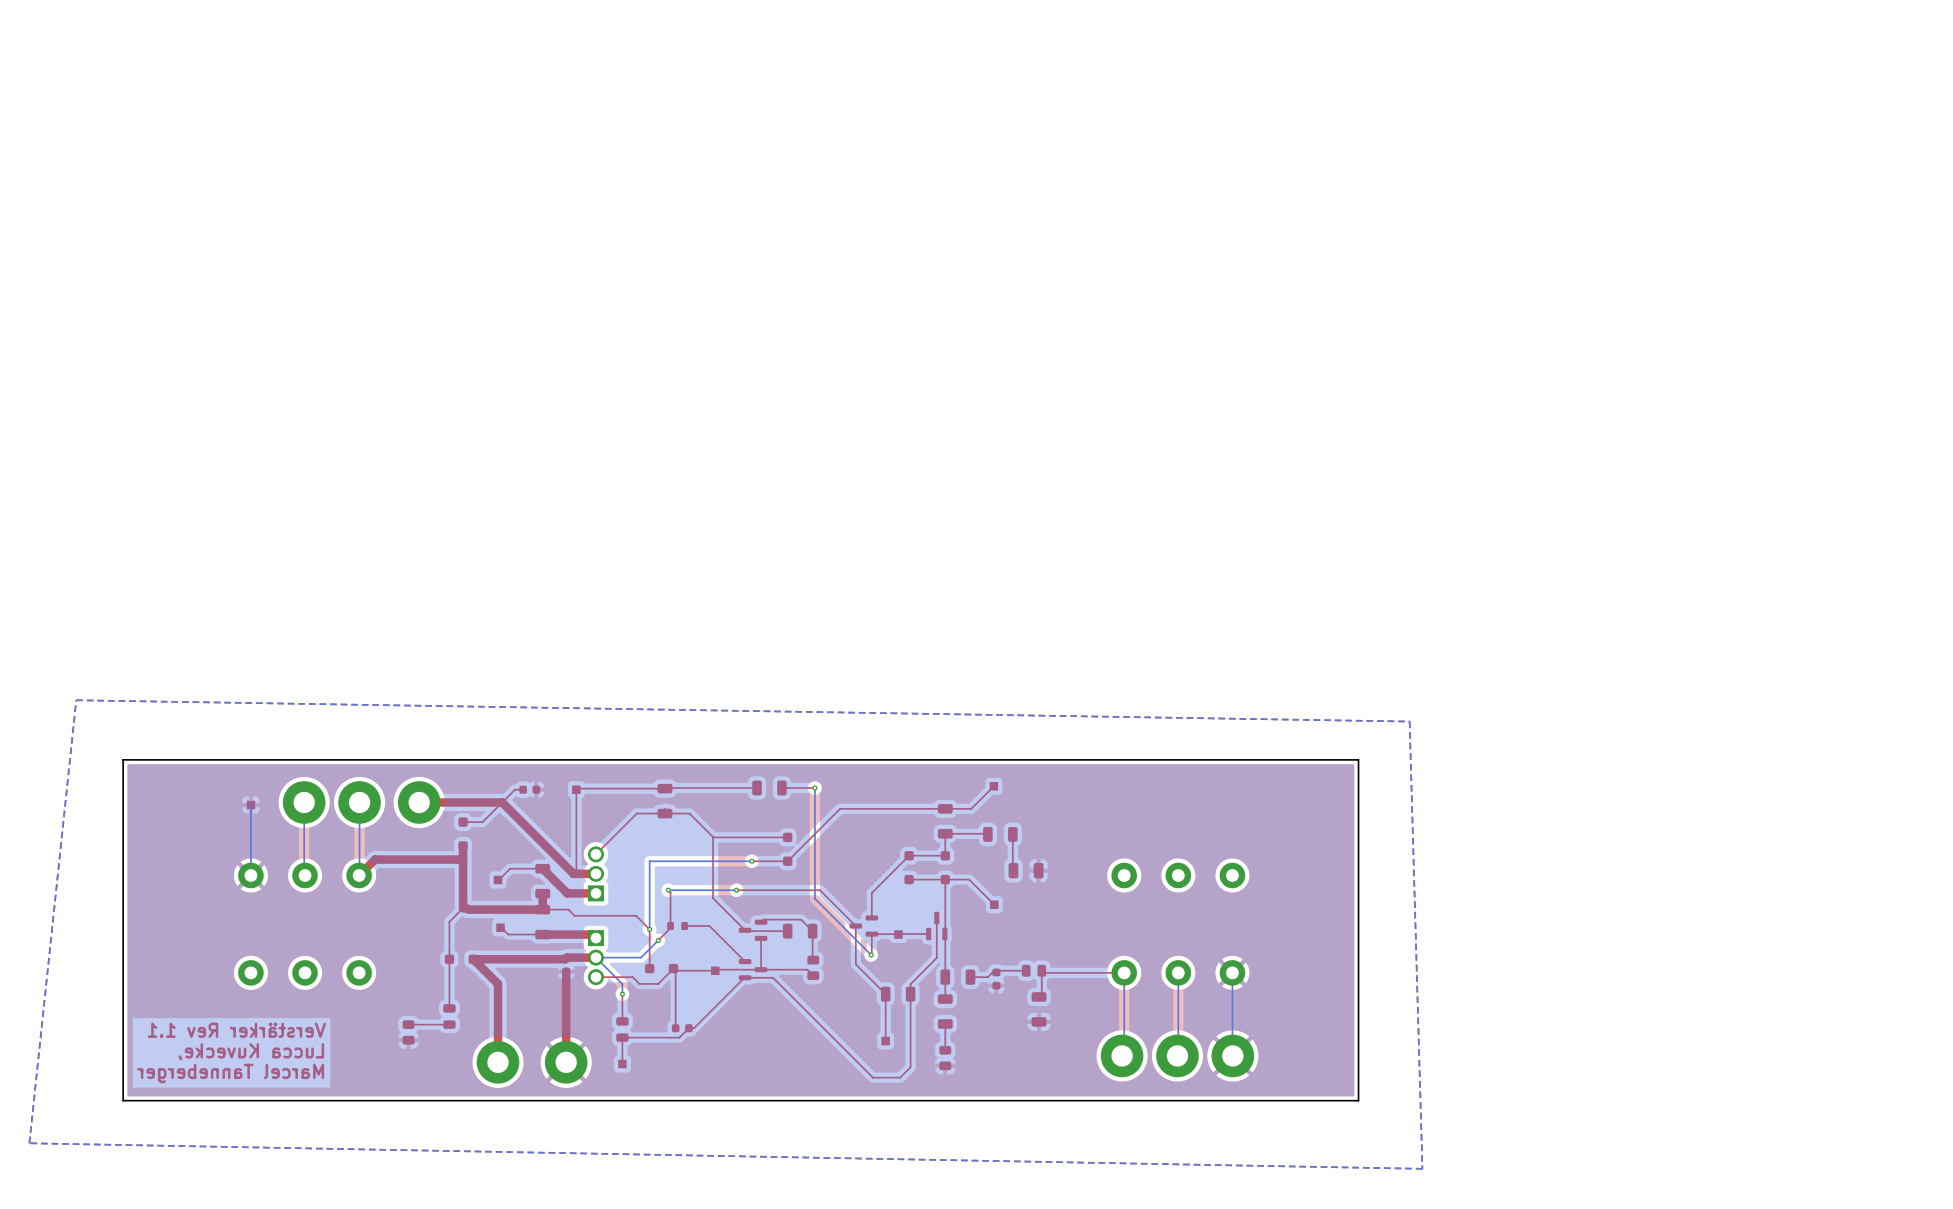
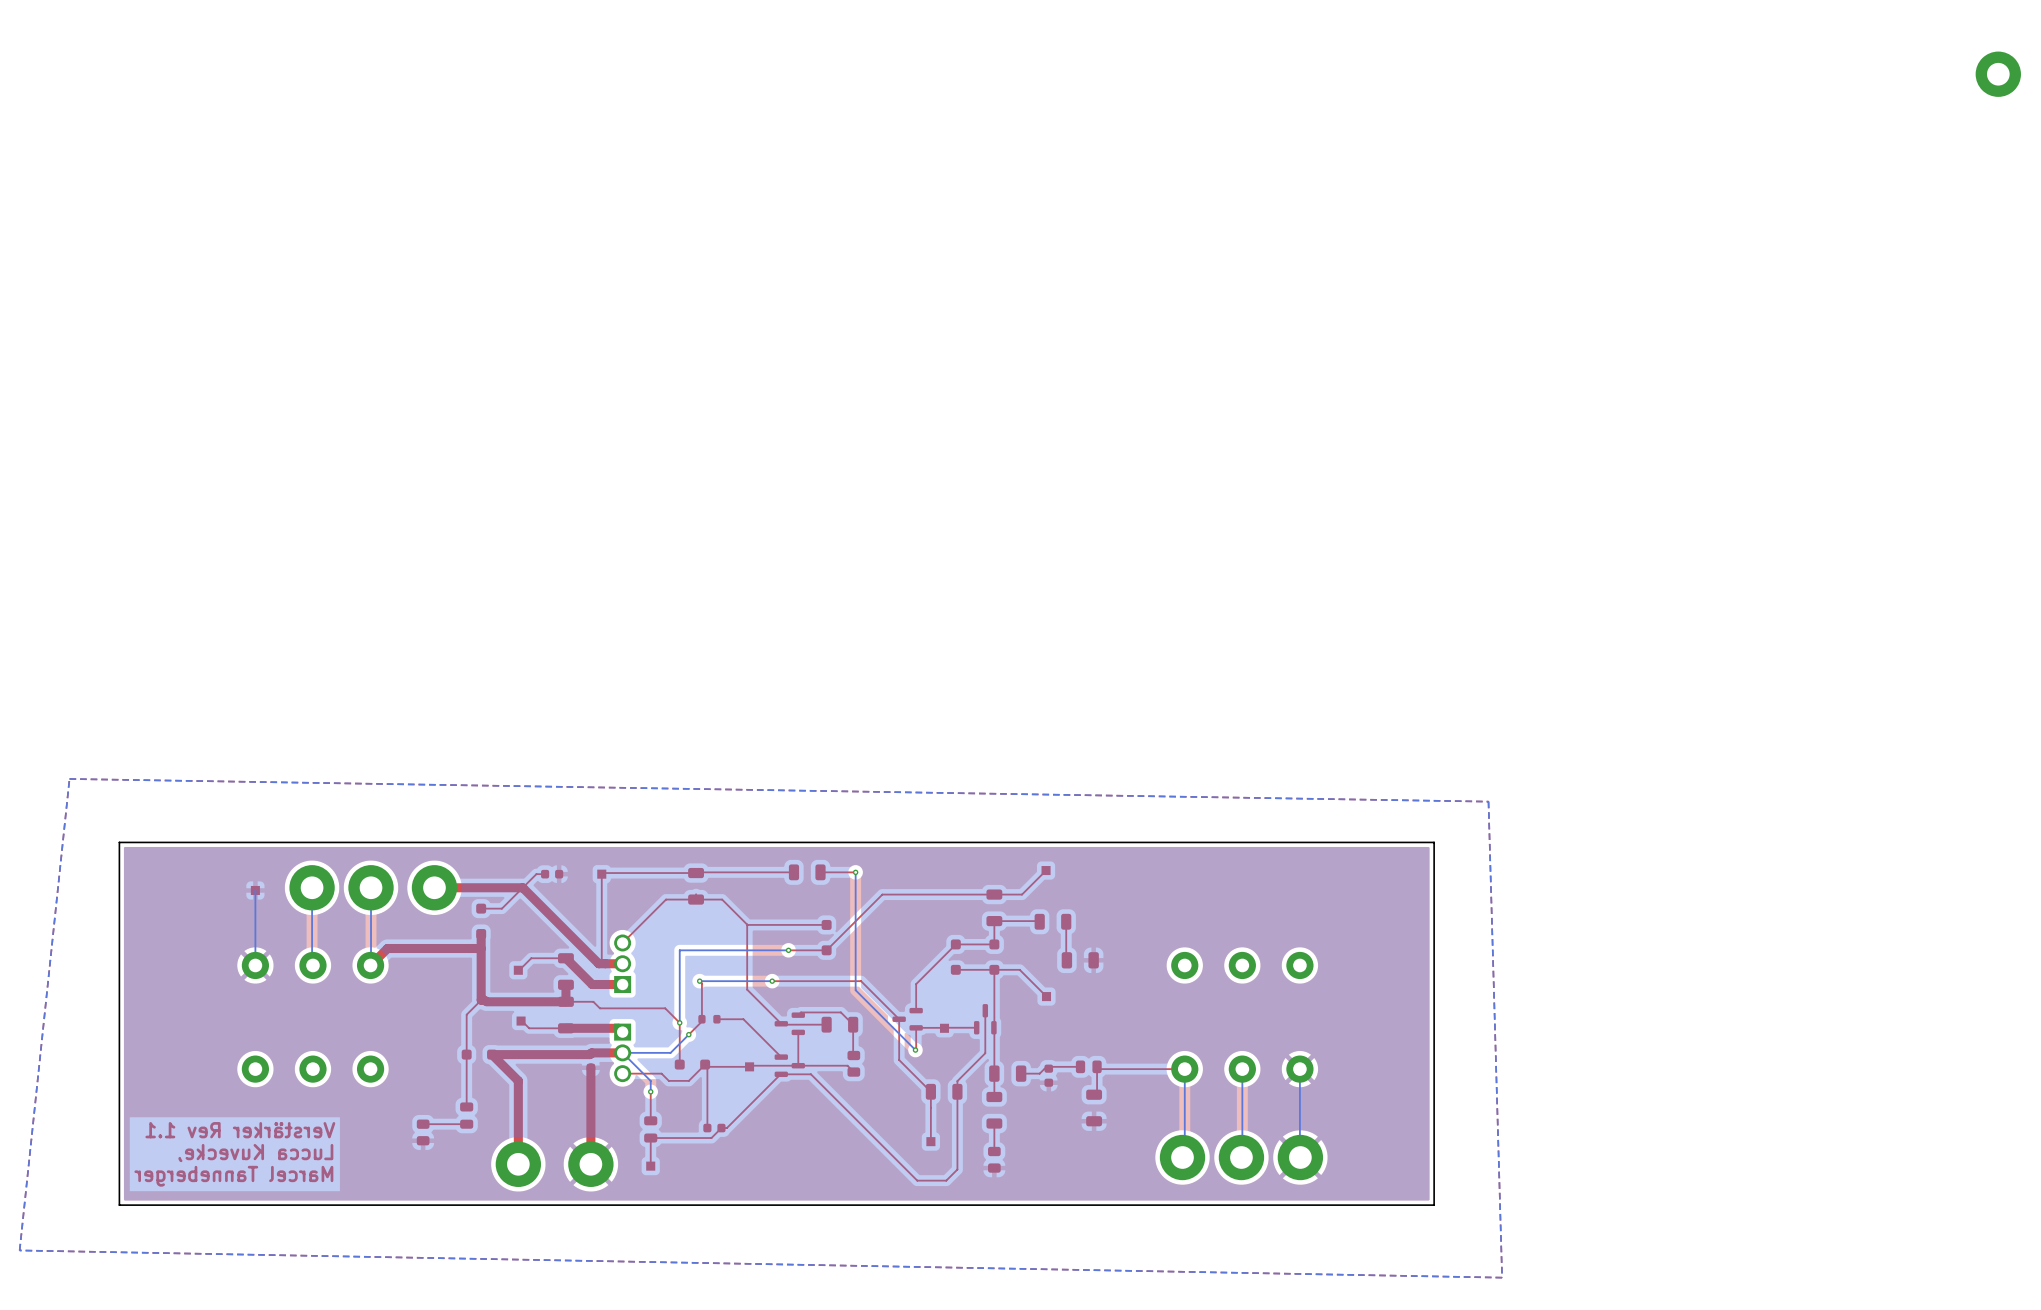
part: none -> (1998, 74)

